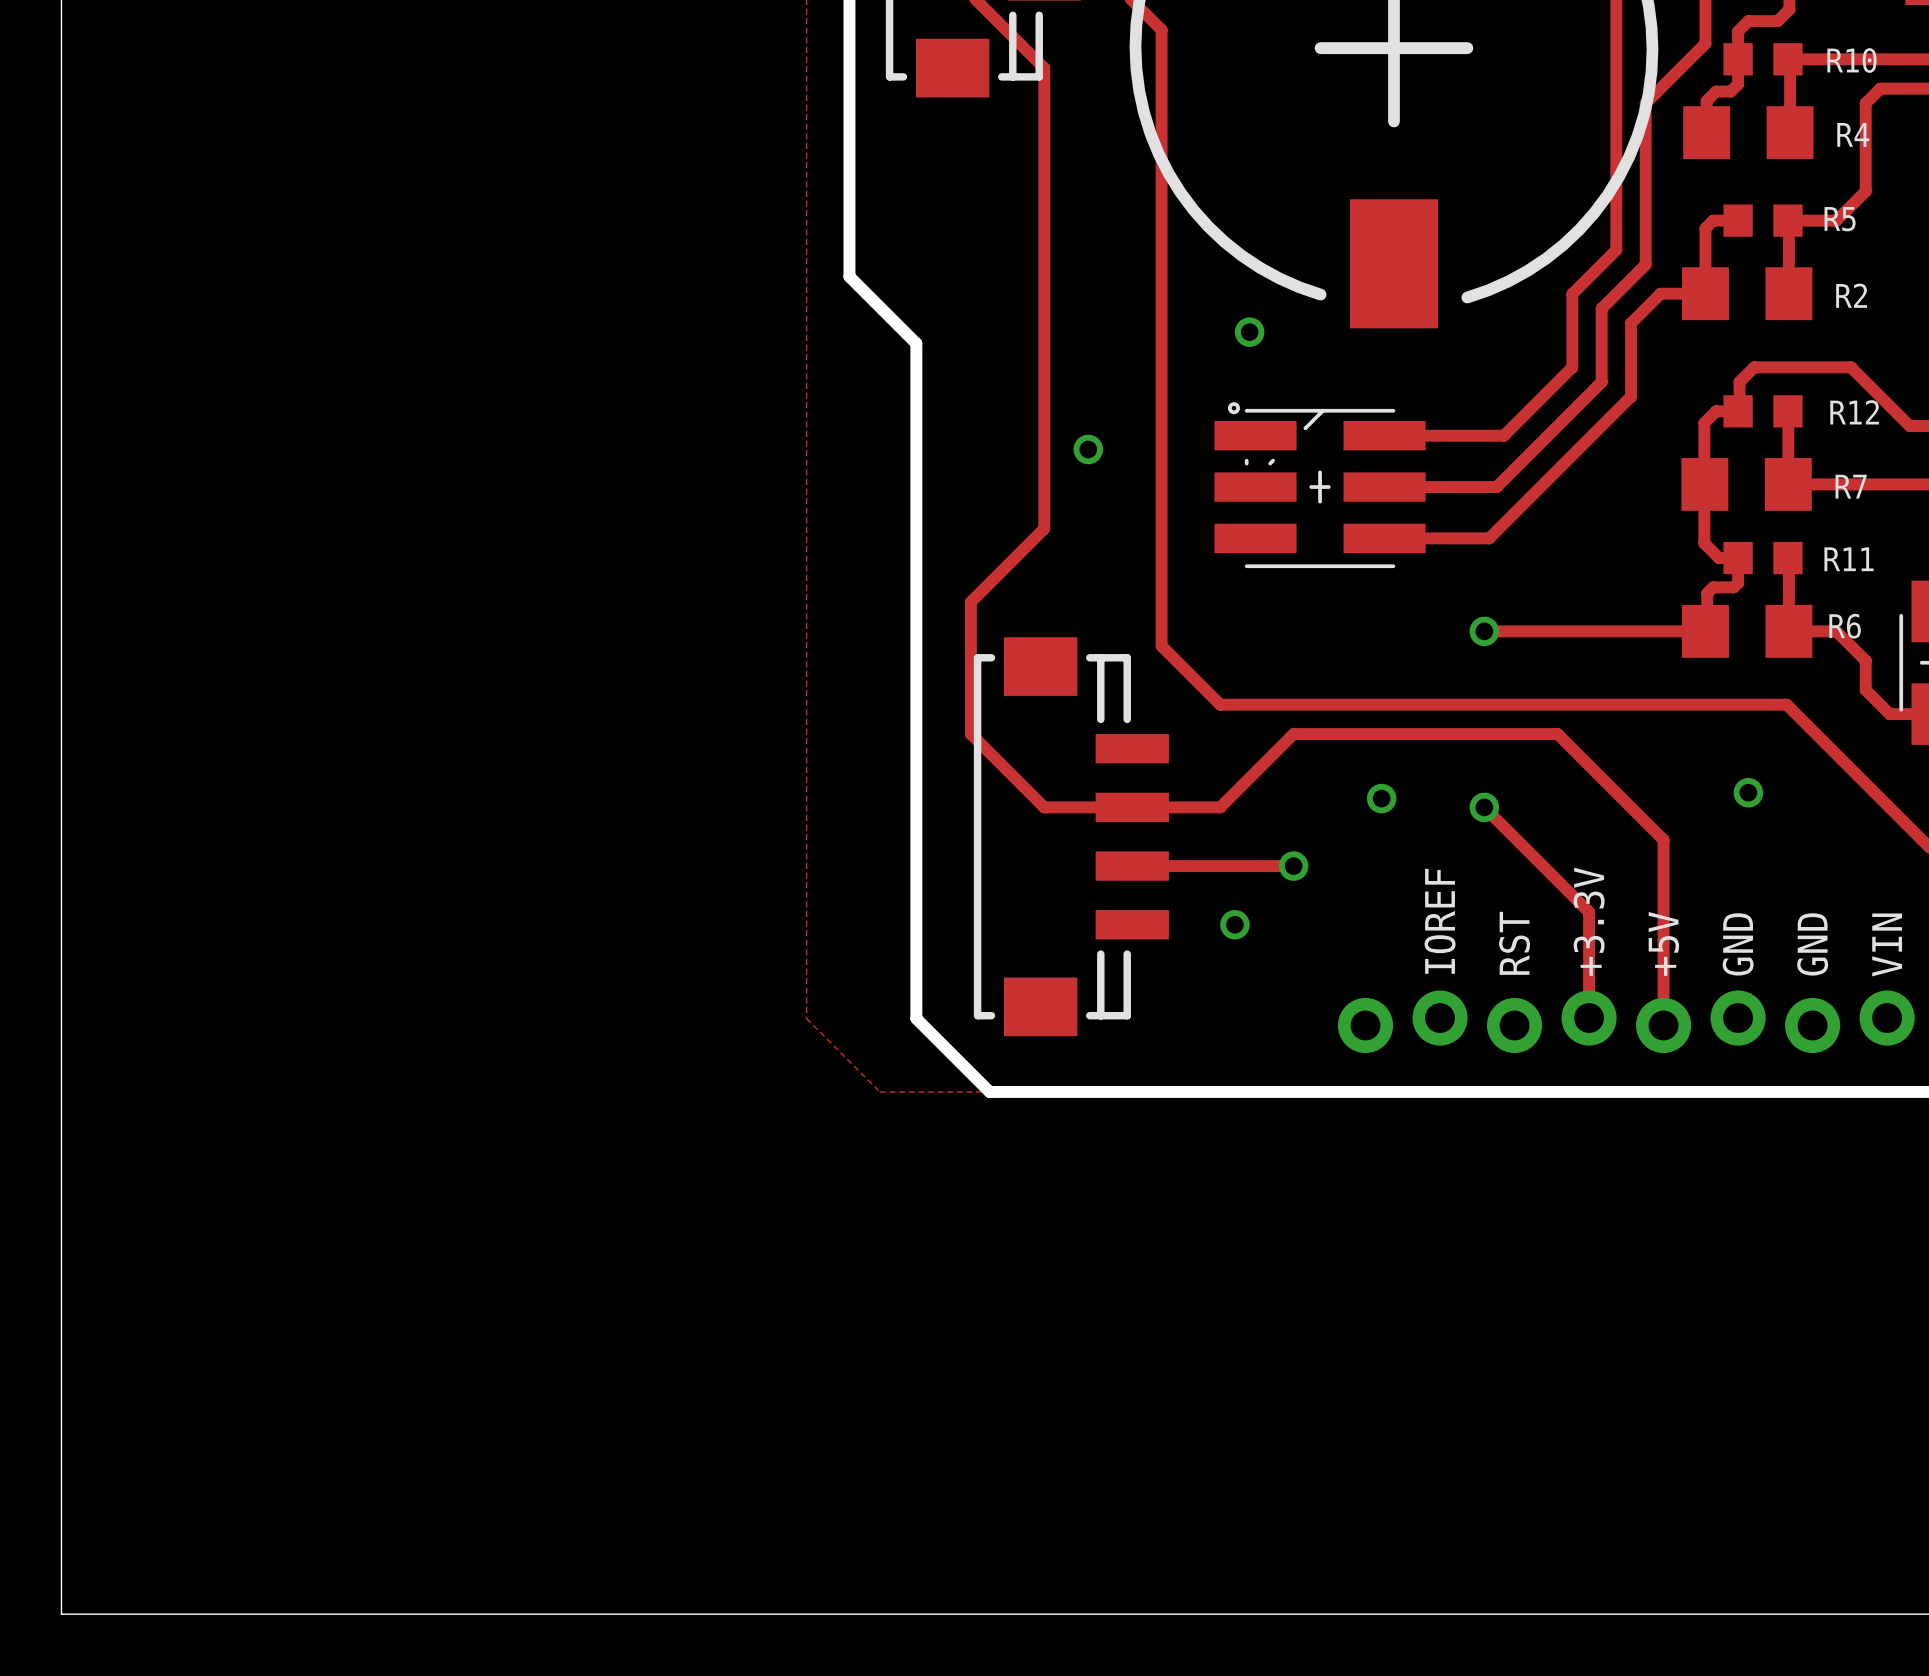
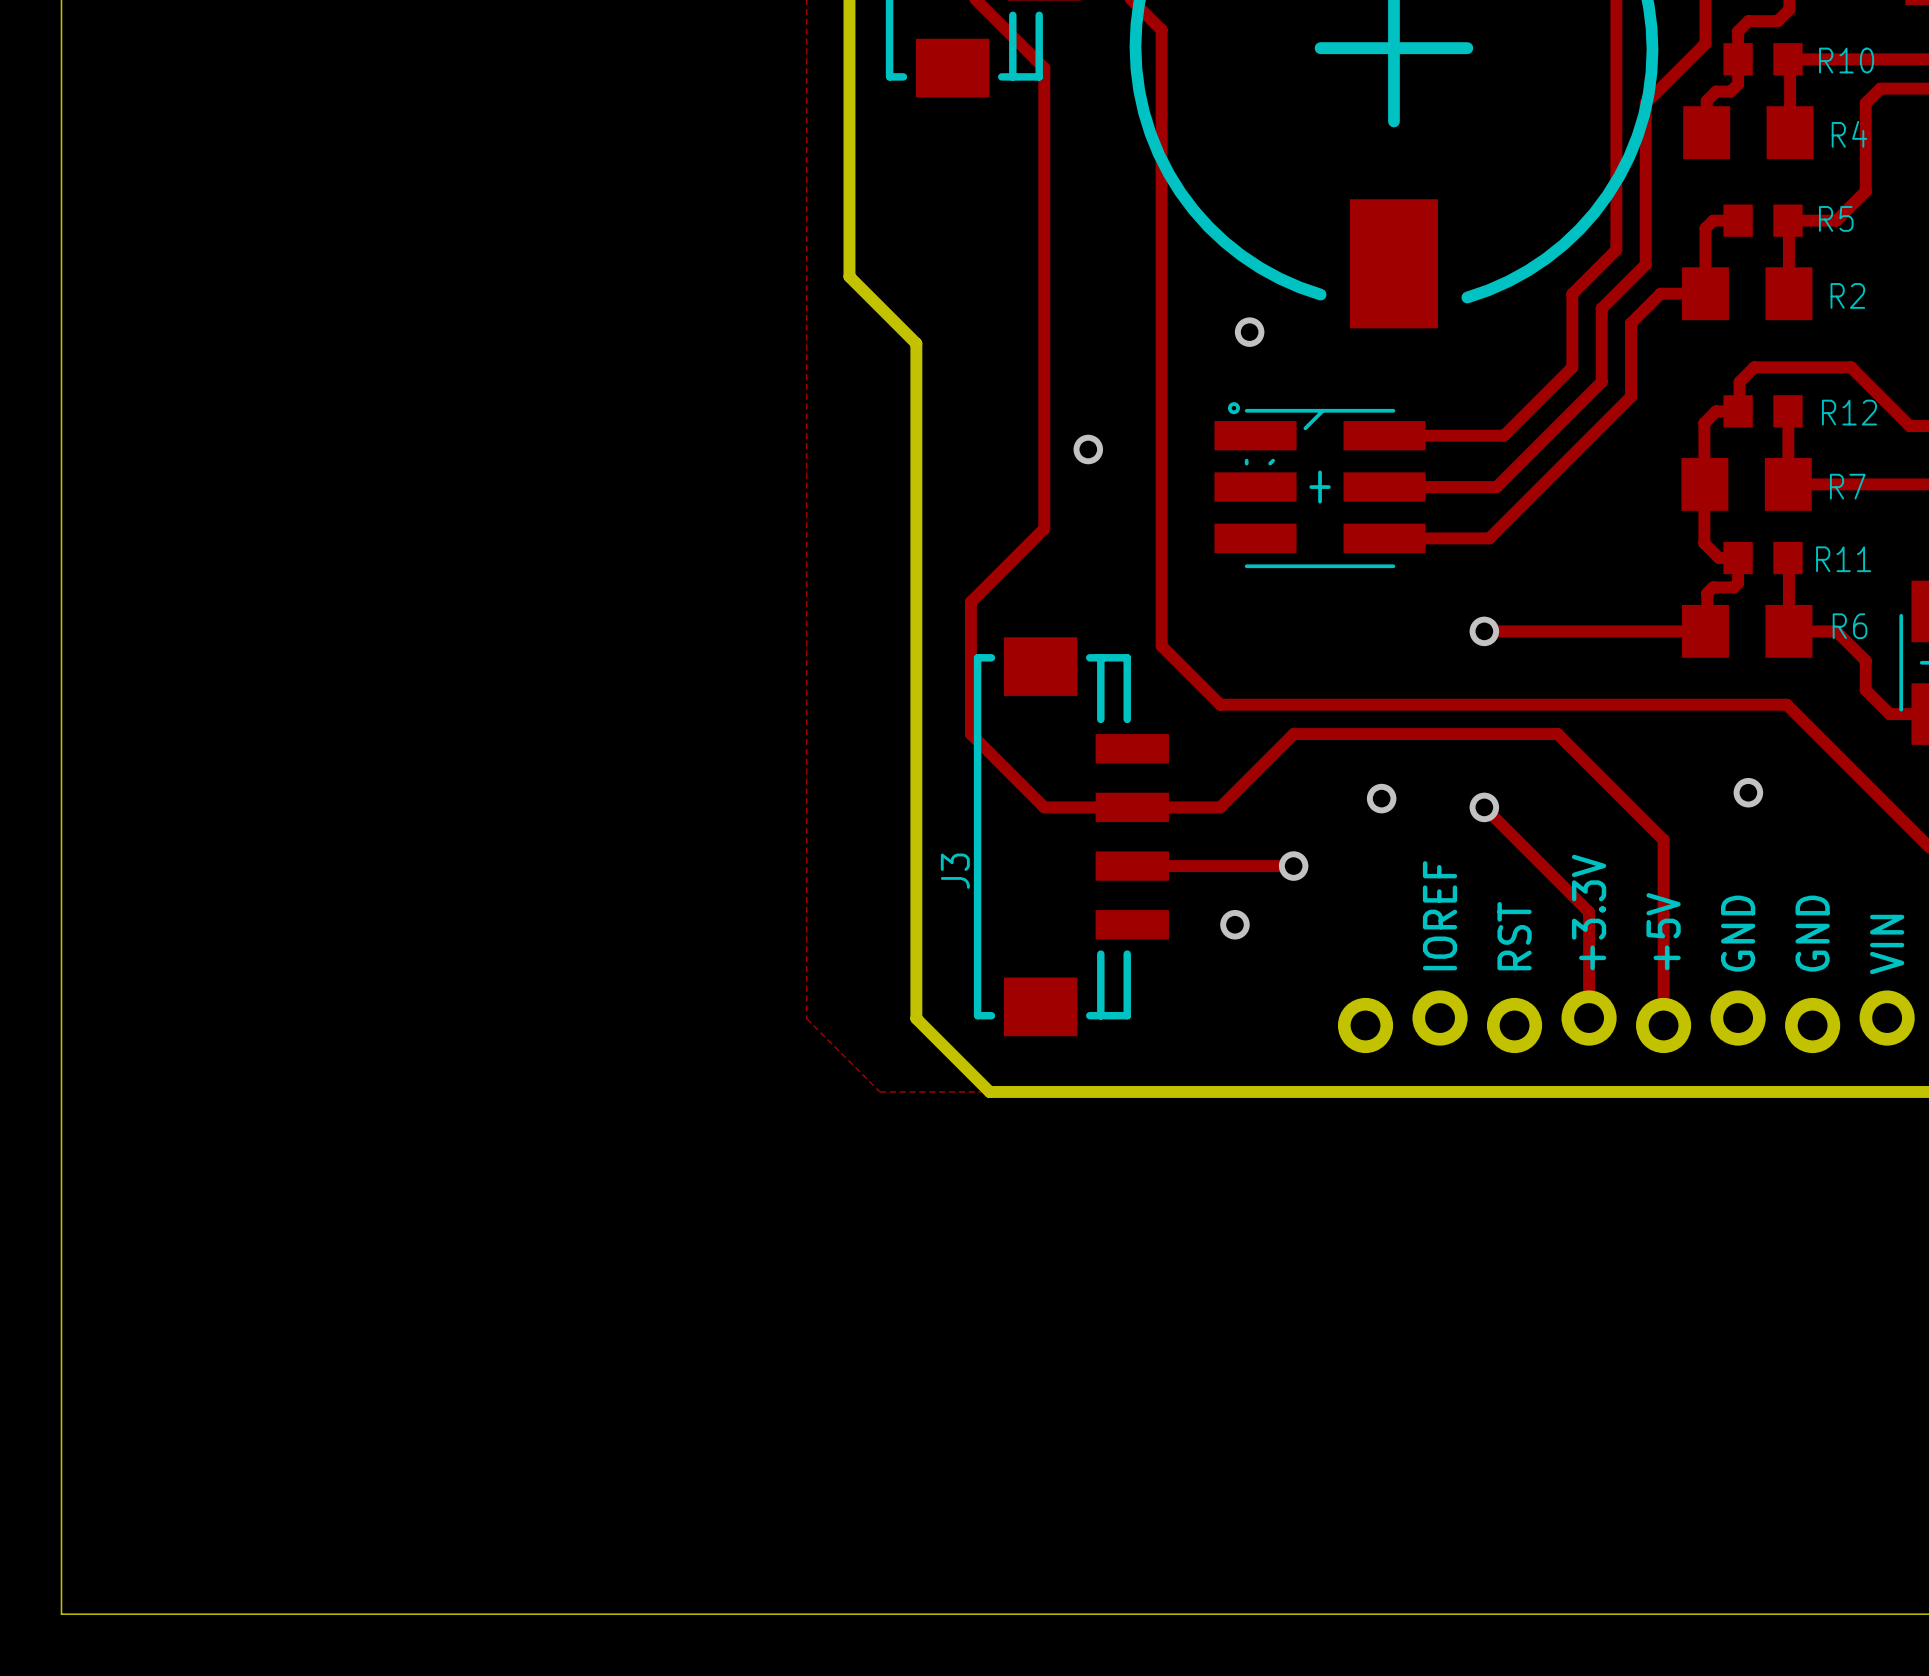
J3 name: none -> J3 (955, 871)

